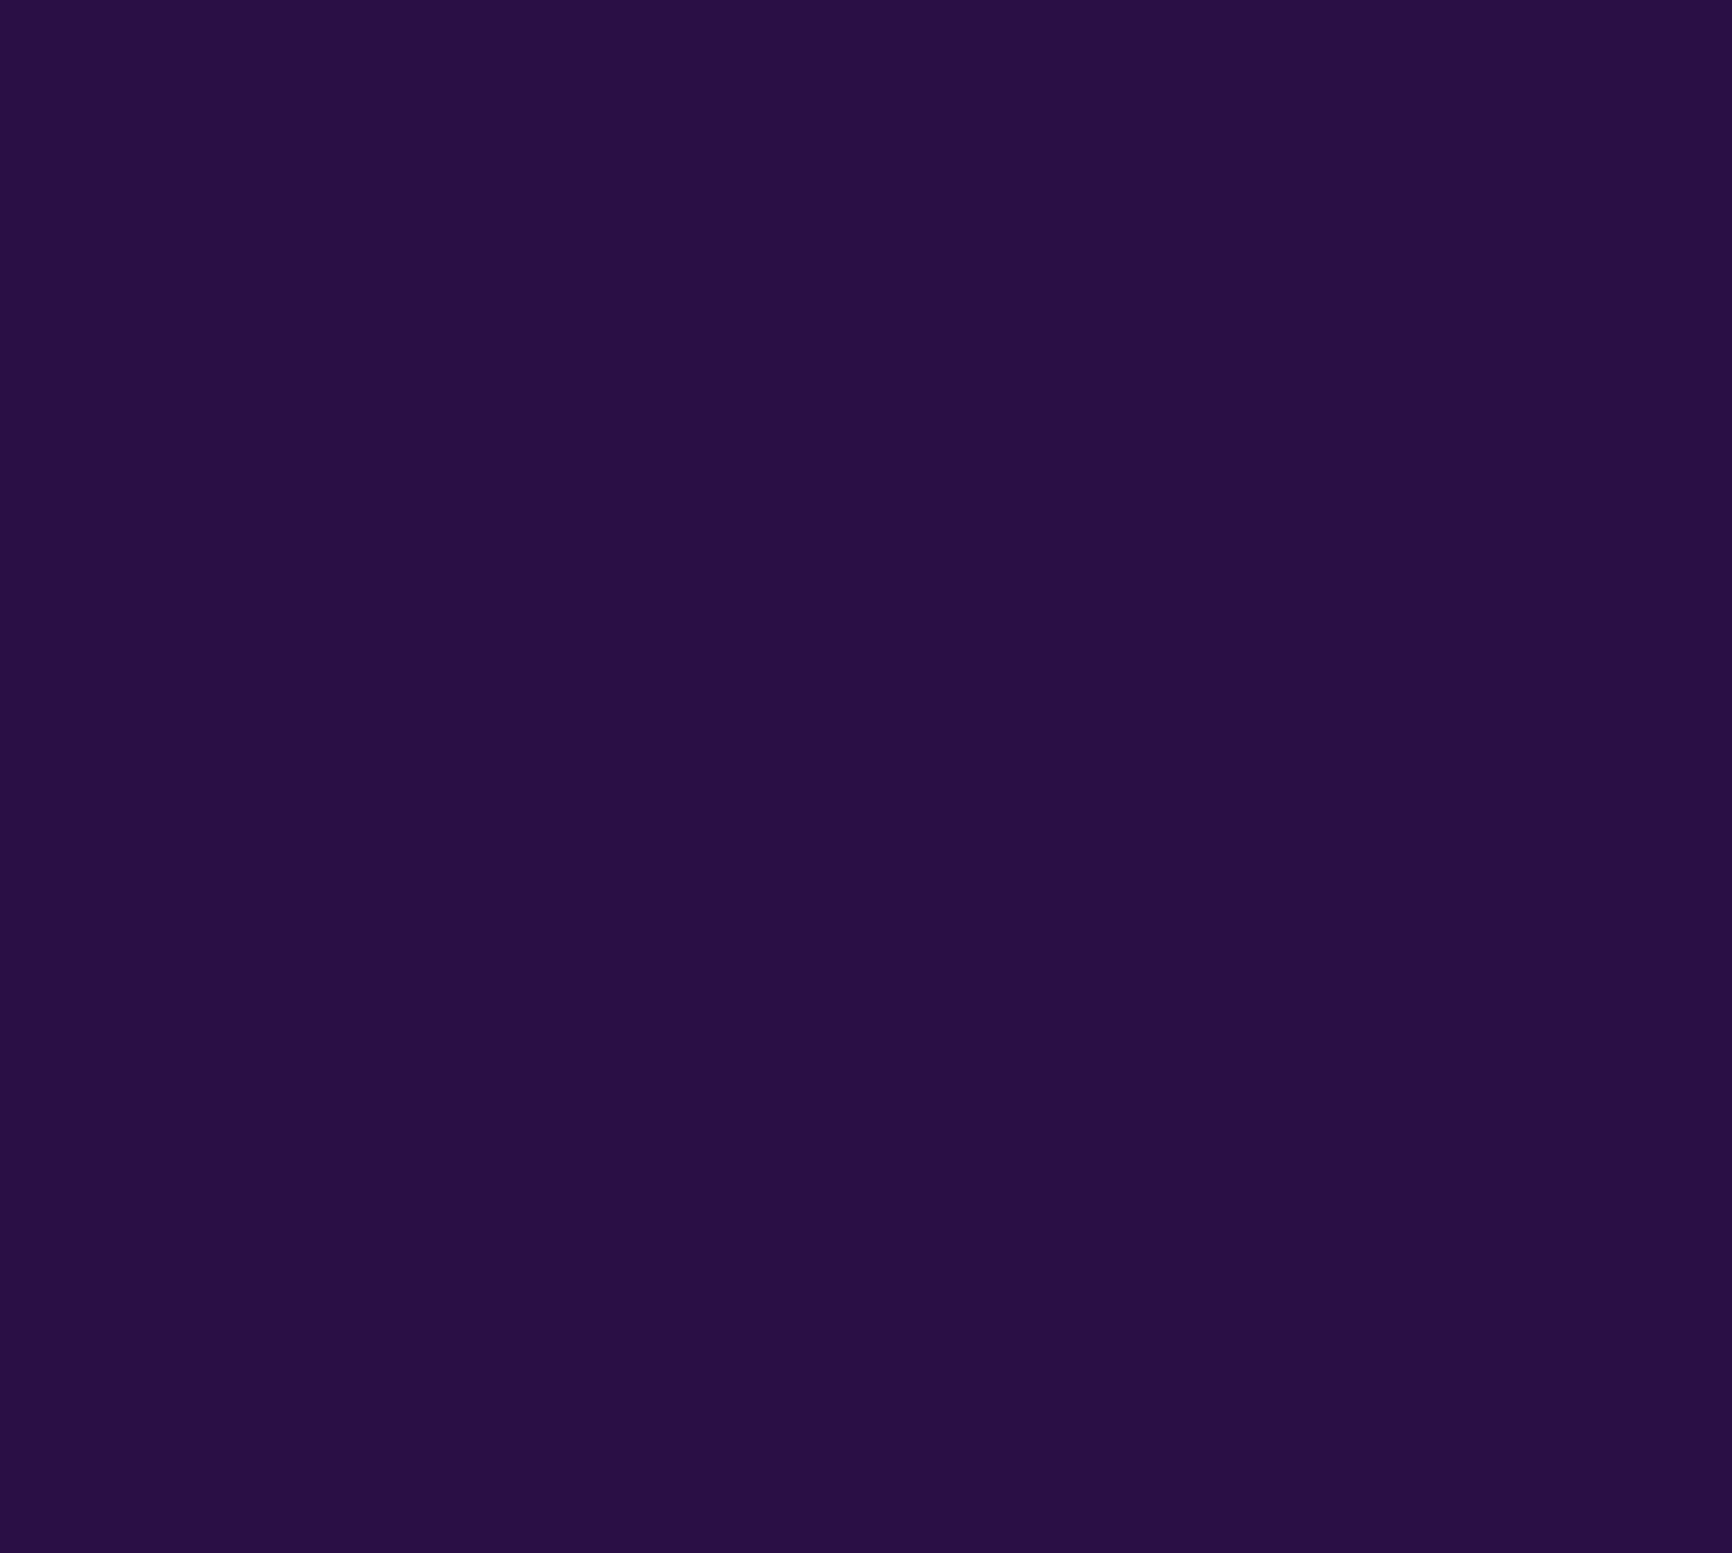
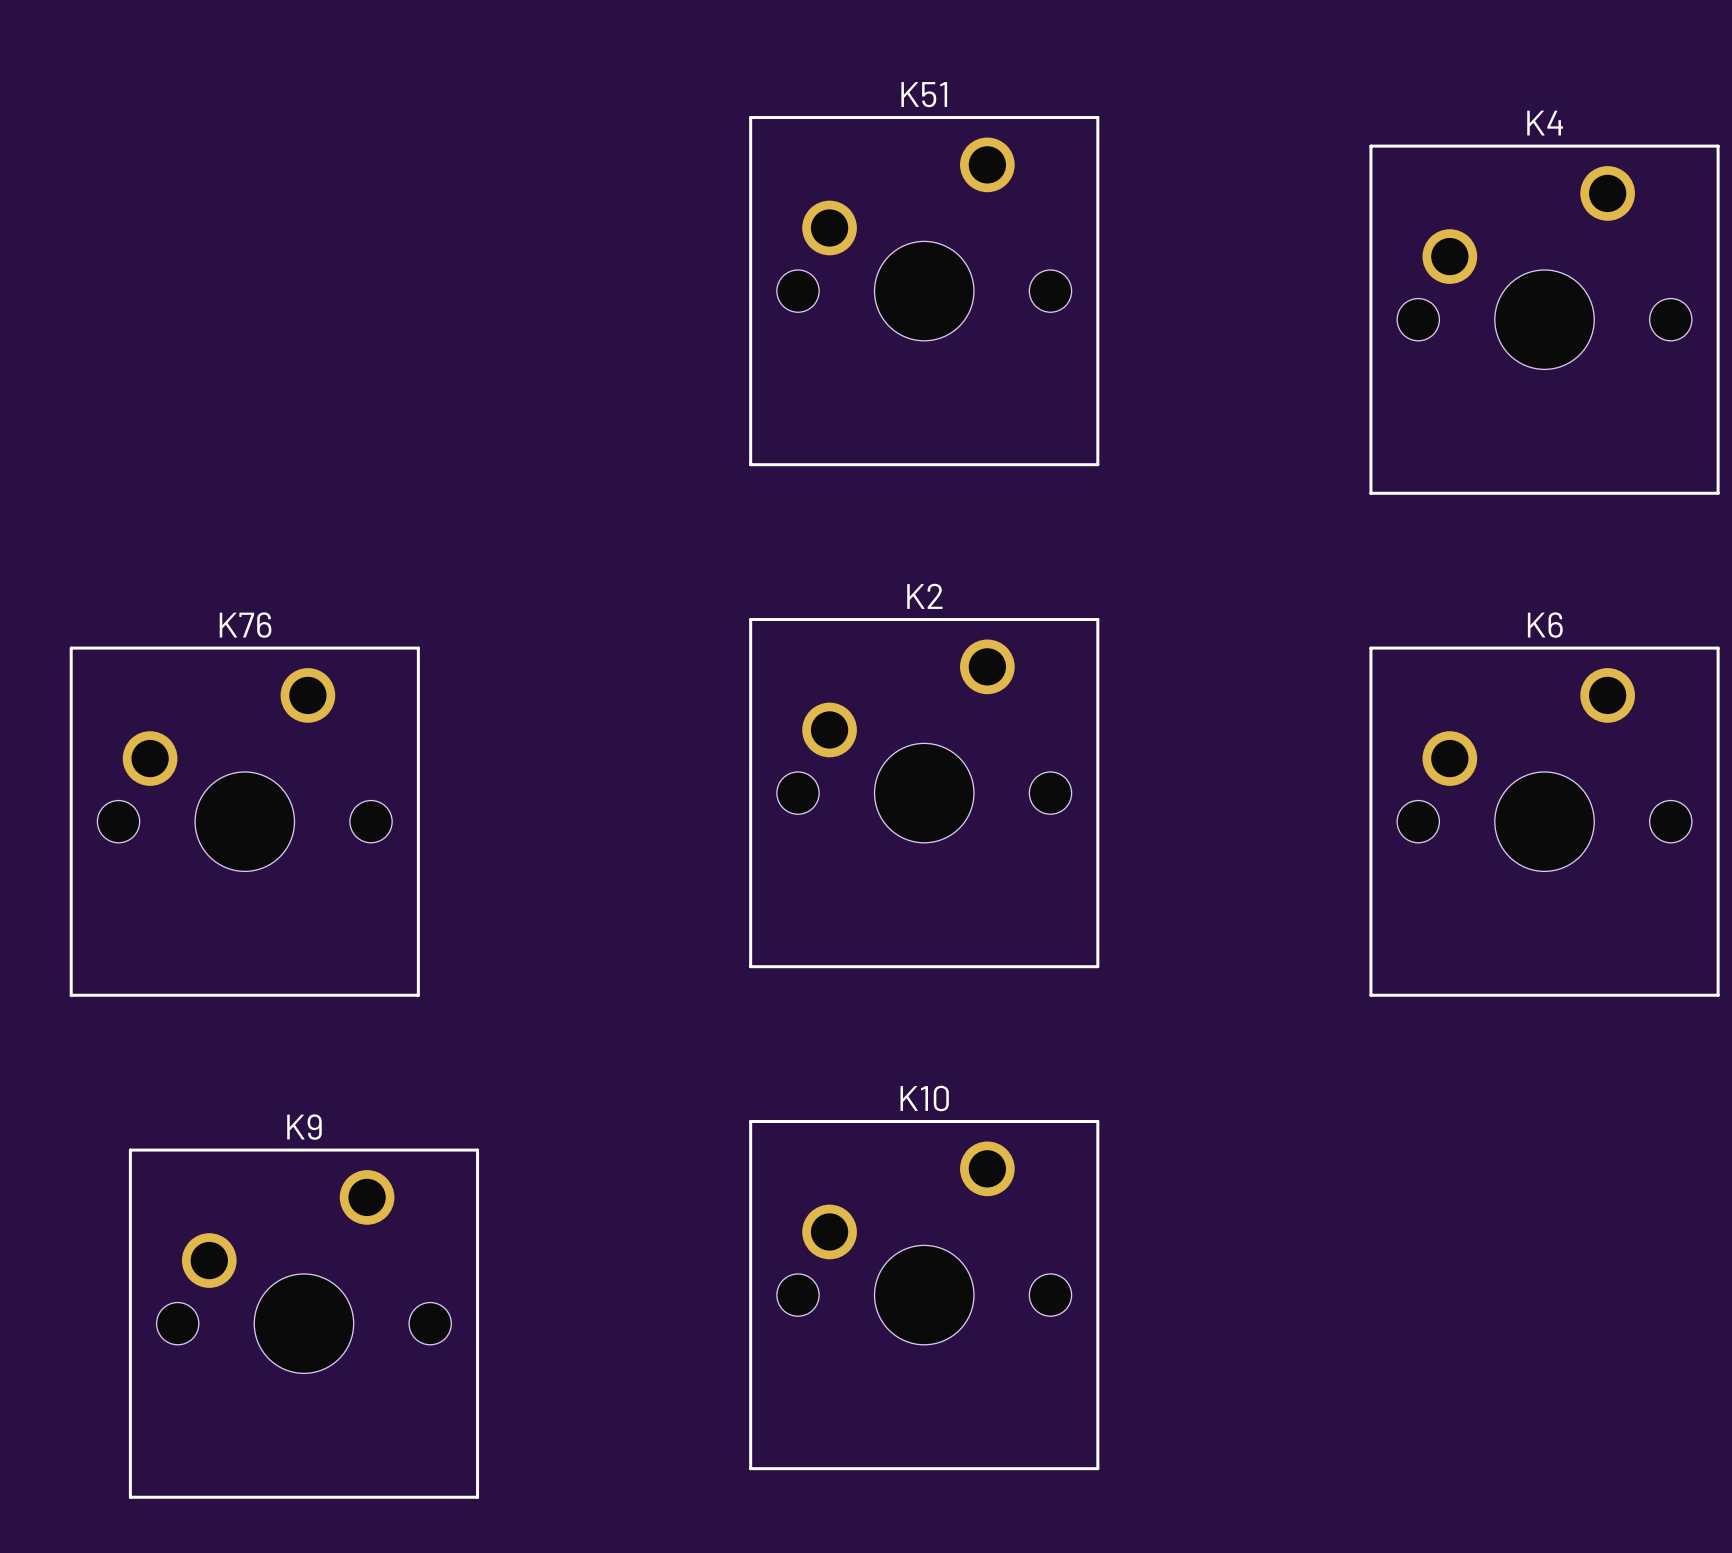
K51: none -> (924, 291)
K4: none -> (1544, 319)
K2: none -> (924, 793)
K76: none -> (244, 821)
K6: none -> (1544, 821)
K10: none -> (924, 1295)
K9: none -> (303, 1323)

